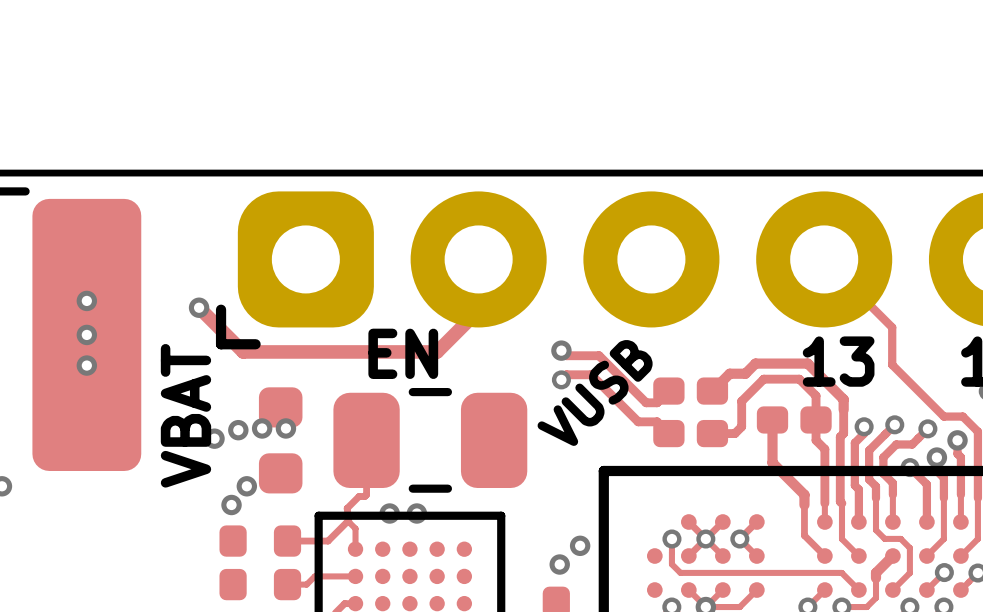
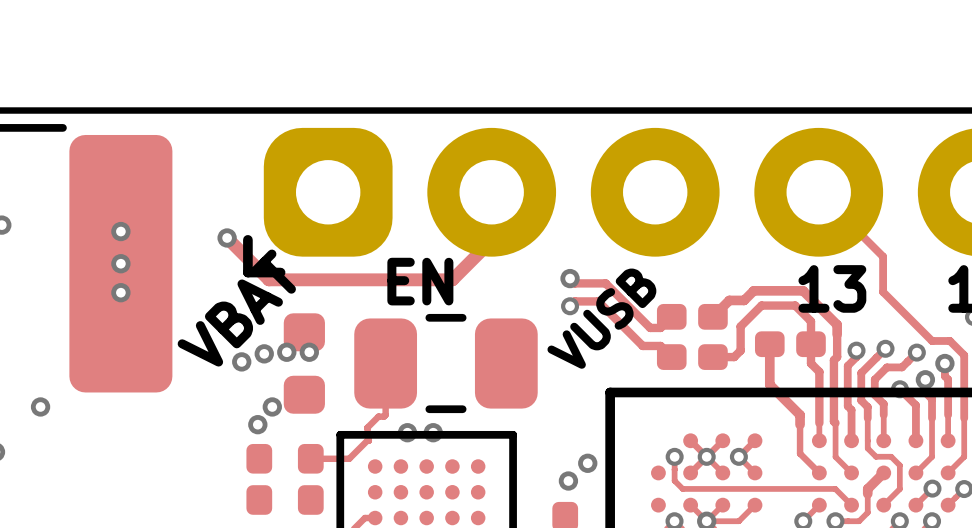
text rotation: 0° (185, 415) -> 45° clockwise (236, 308)
track: (348, 522) (355, 528) (355, 549) -> none
track: (355, 576) (314, 576) (306, 584) (287, 584) -> none

